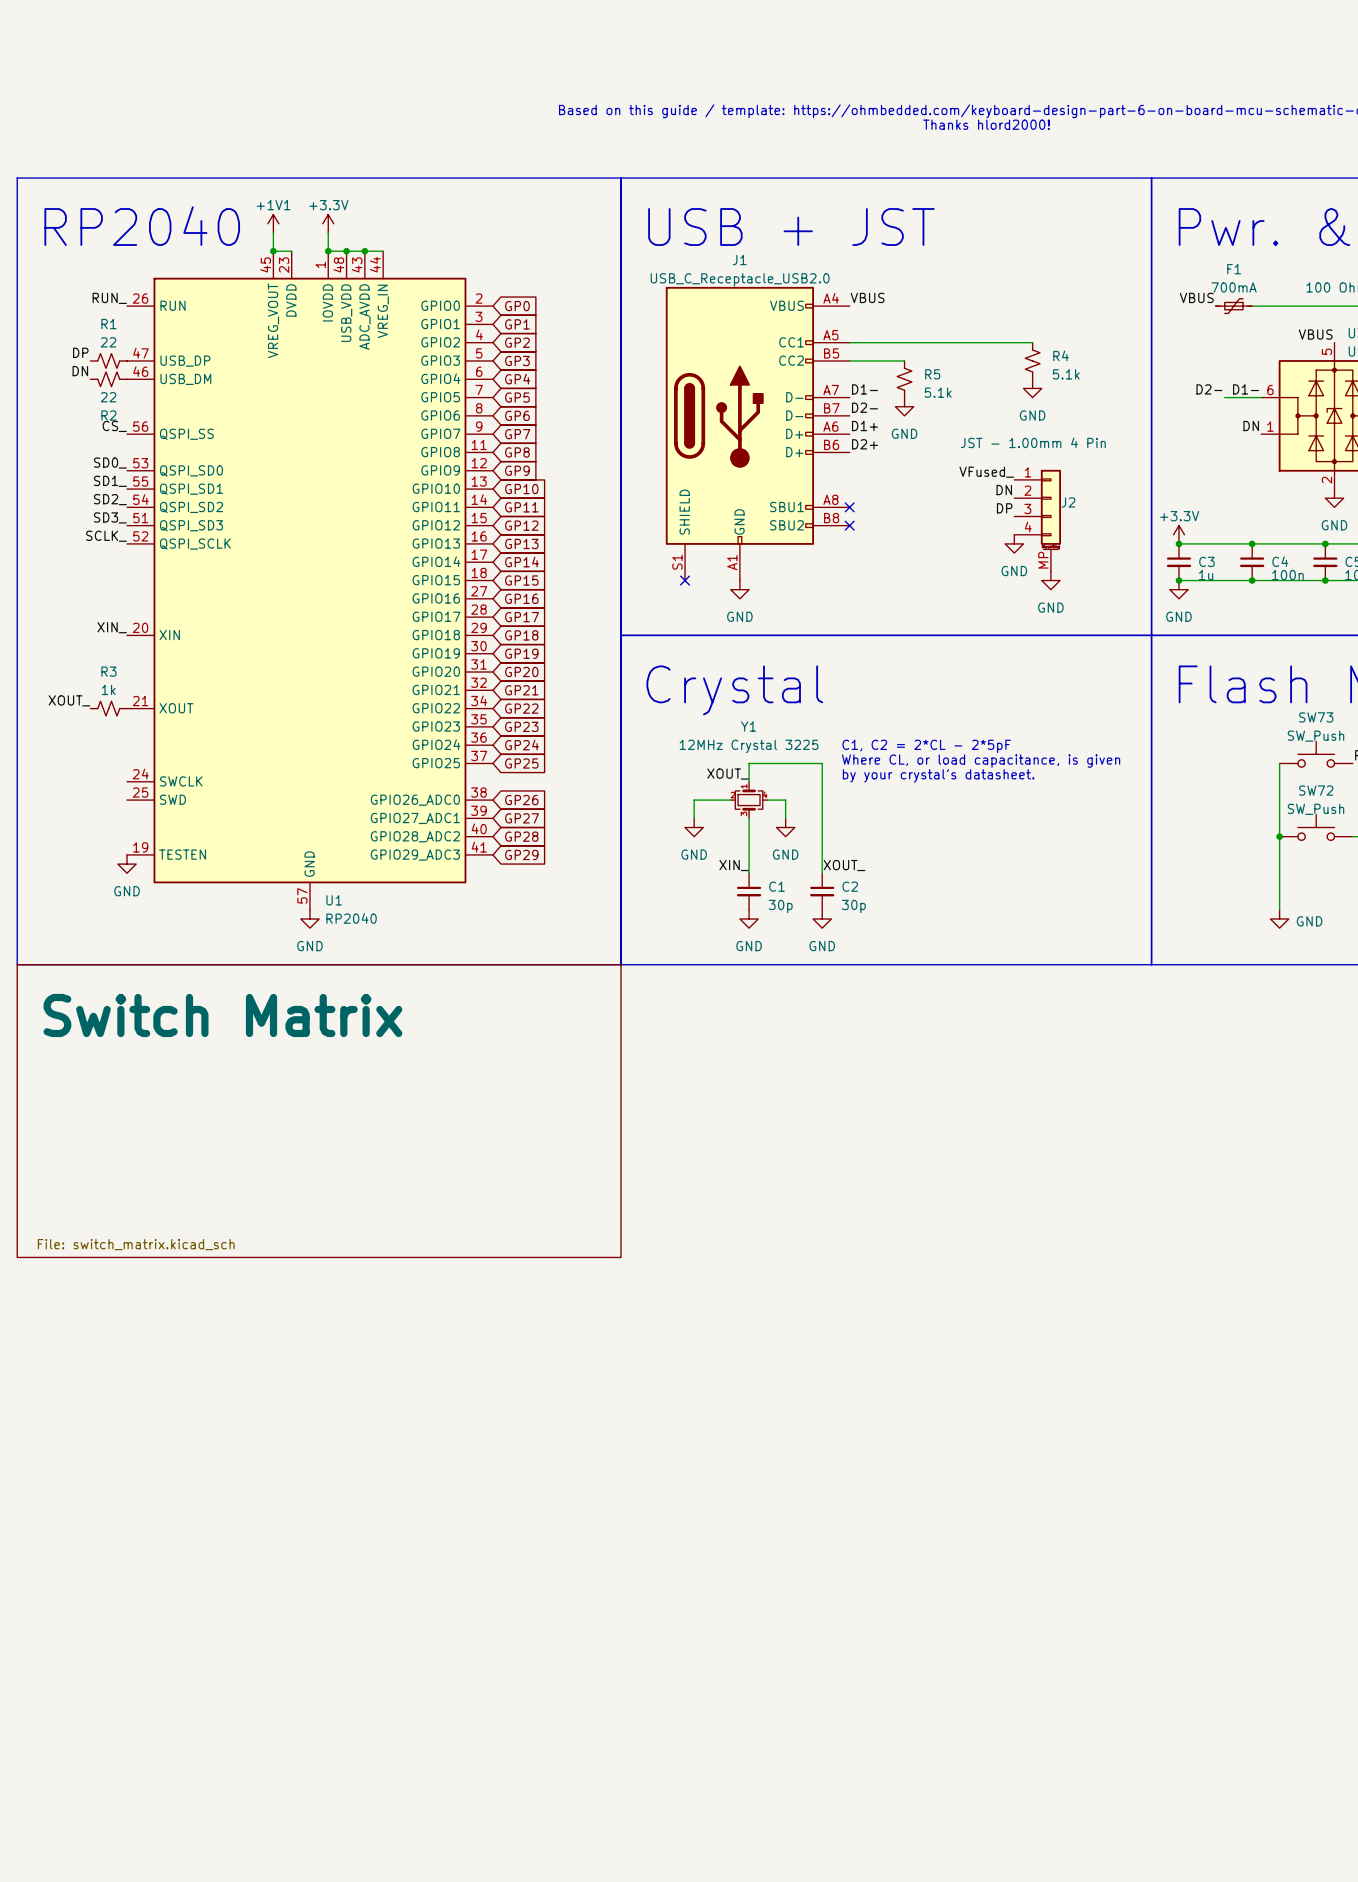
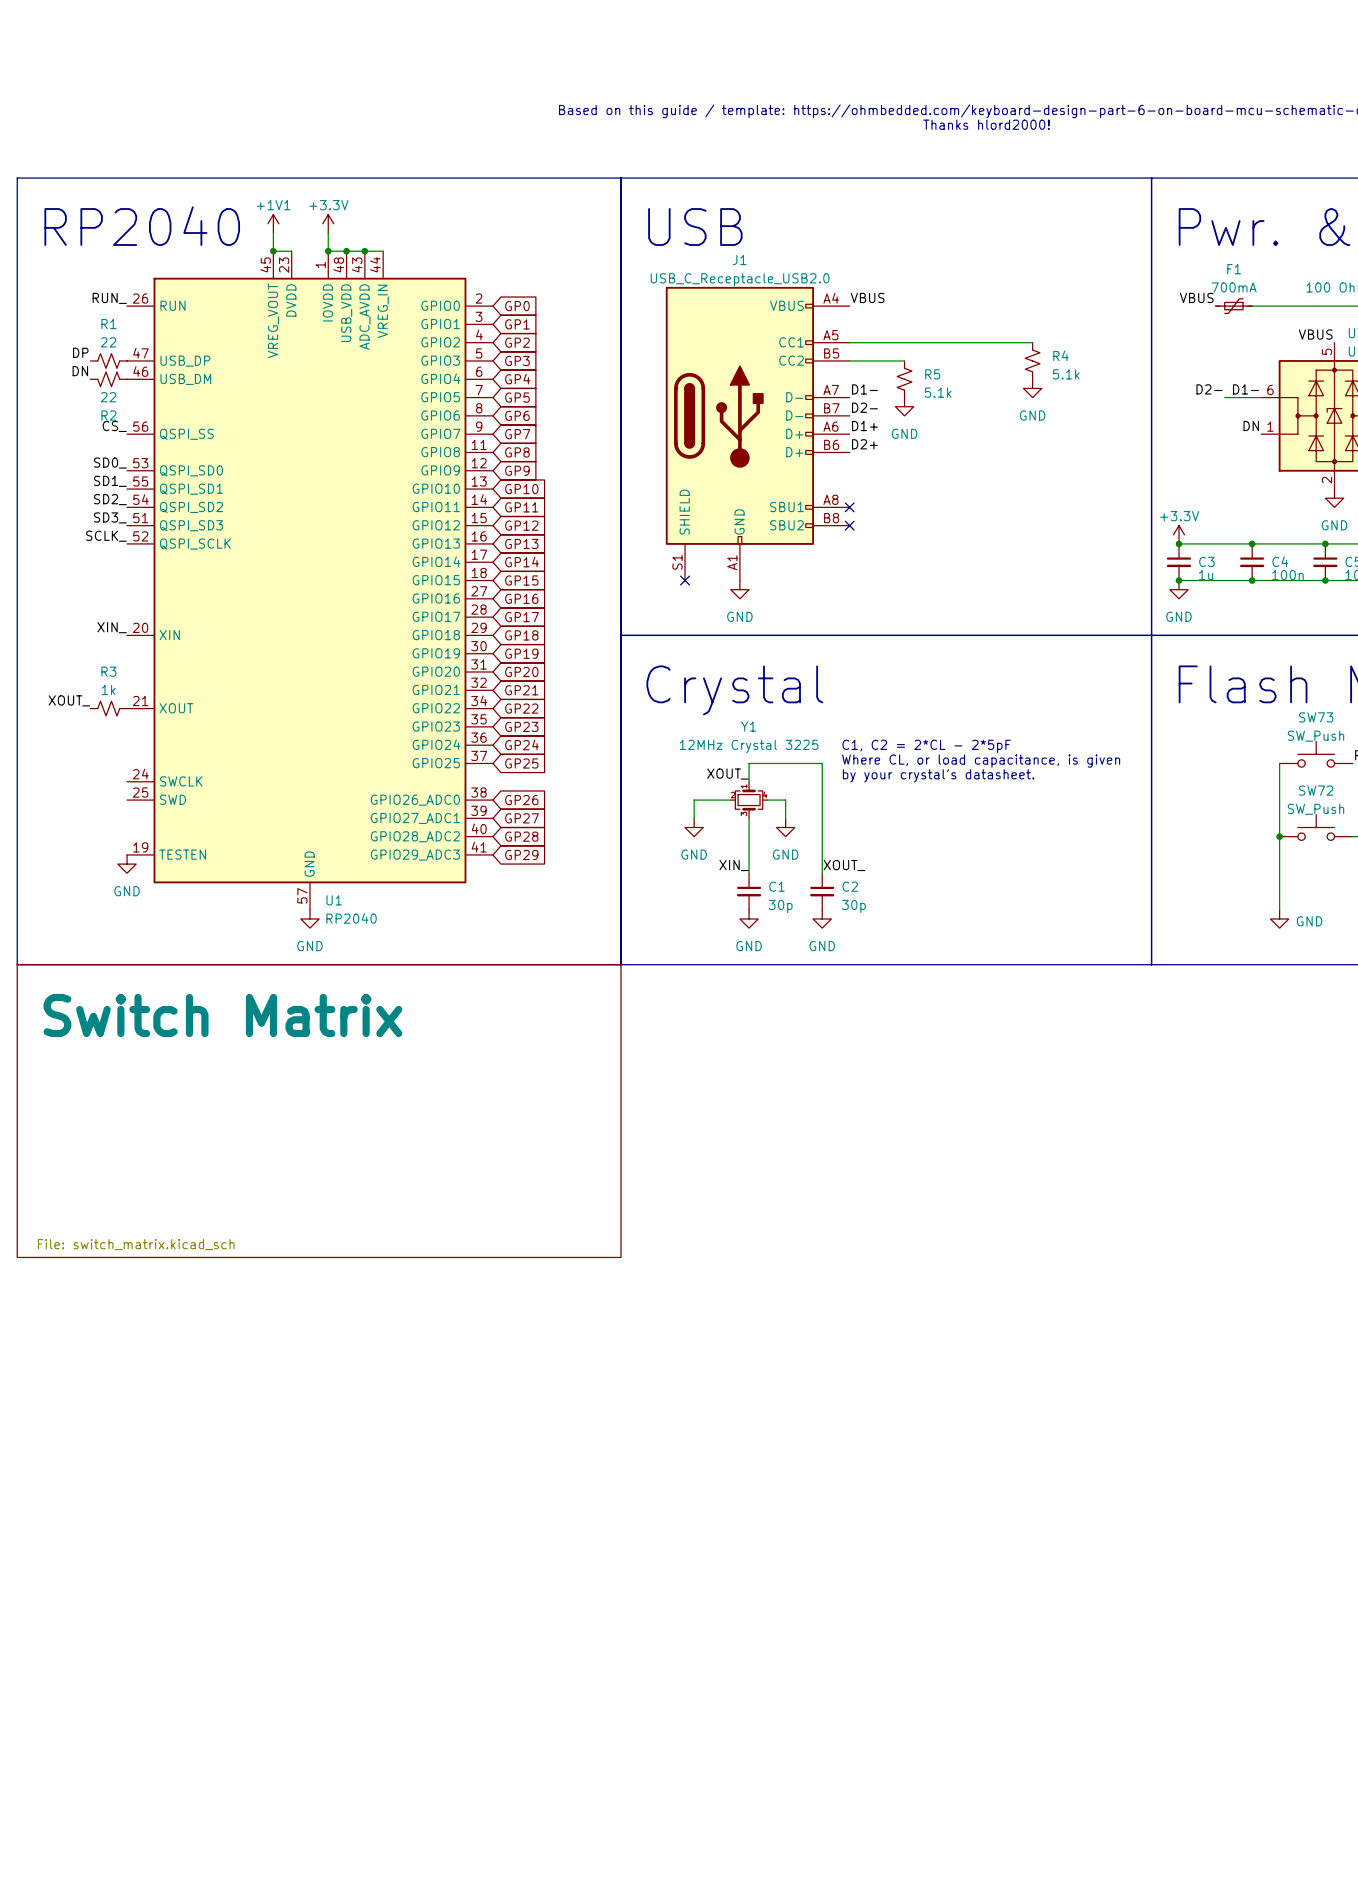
text: USB + JST (791, 227) -> USB (695, 227)
label: VFused_ (986, 472) -> none
label: DN (1004, 490) -> none
label: DP (1004, 508) -> none
J2: JST - 1.00mm 4 Pin (1037, 520) -> none
power symbol: GND (1014, 543) -> none
power symbol: GND (1050, 580) -> none

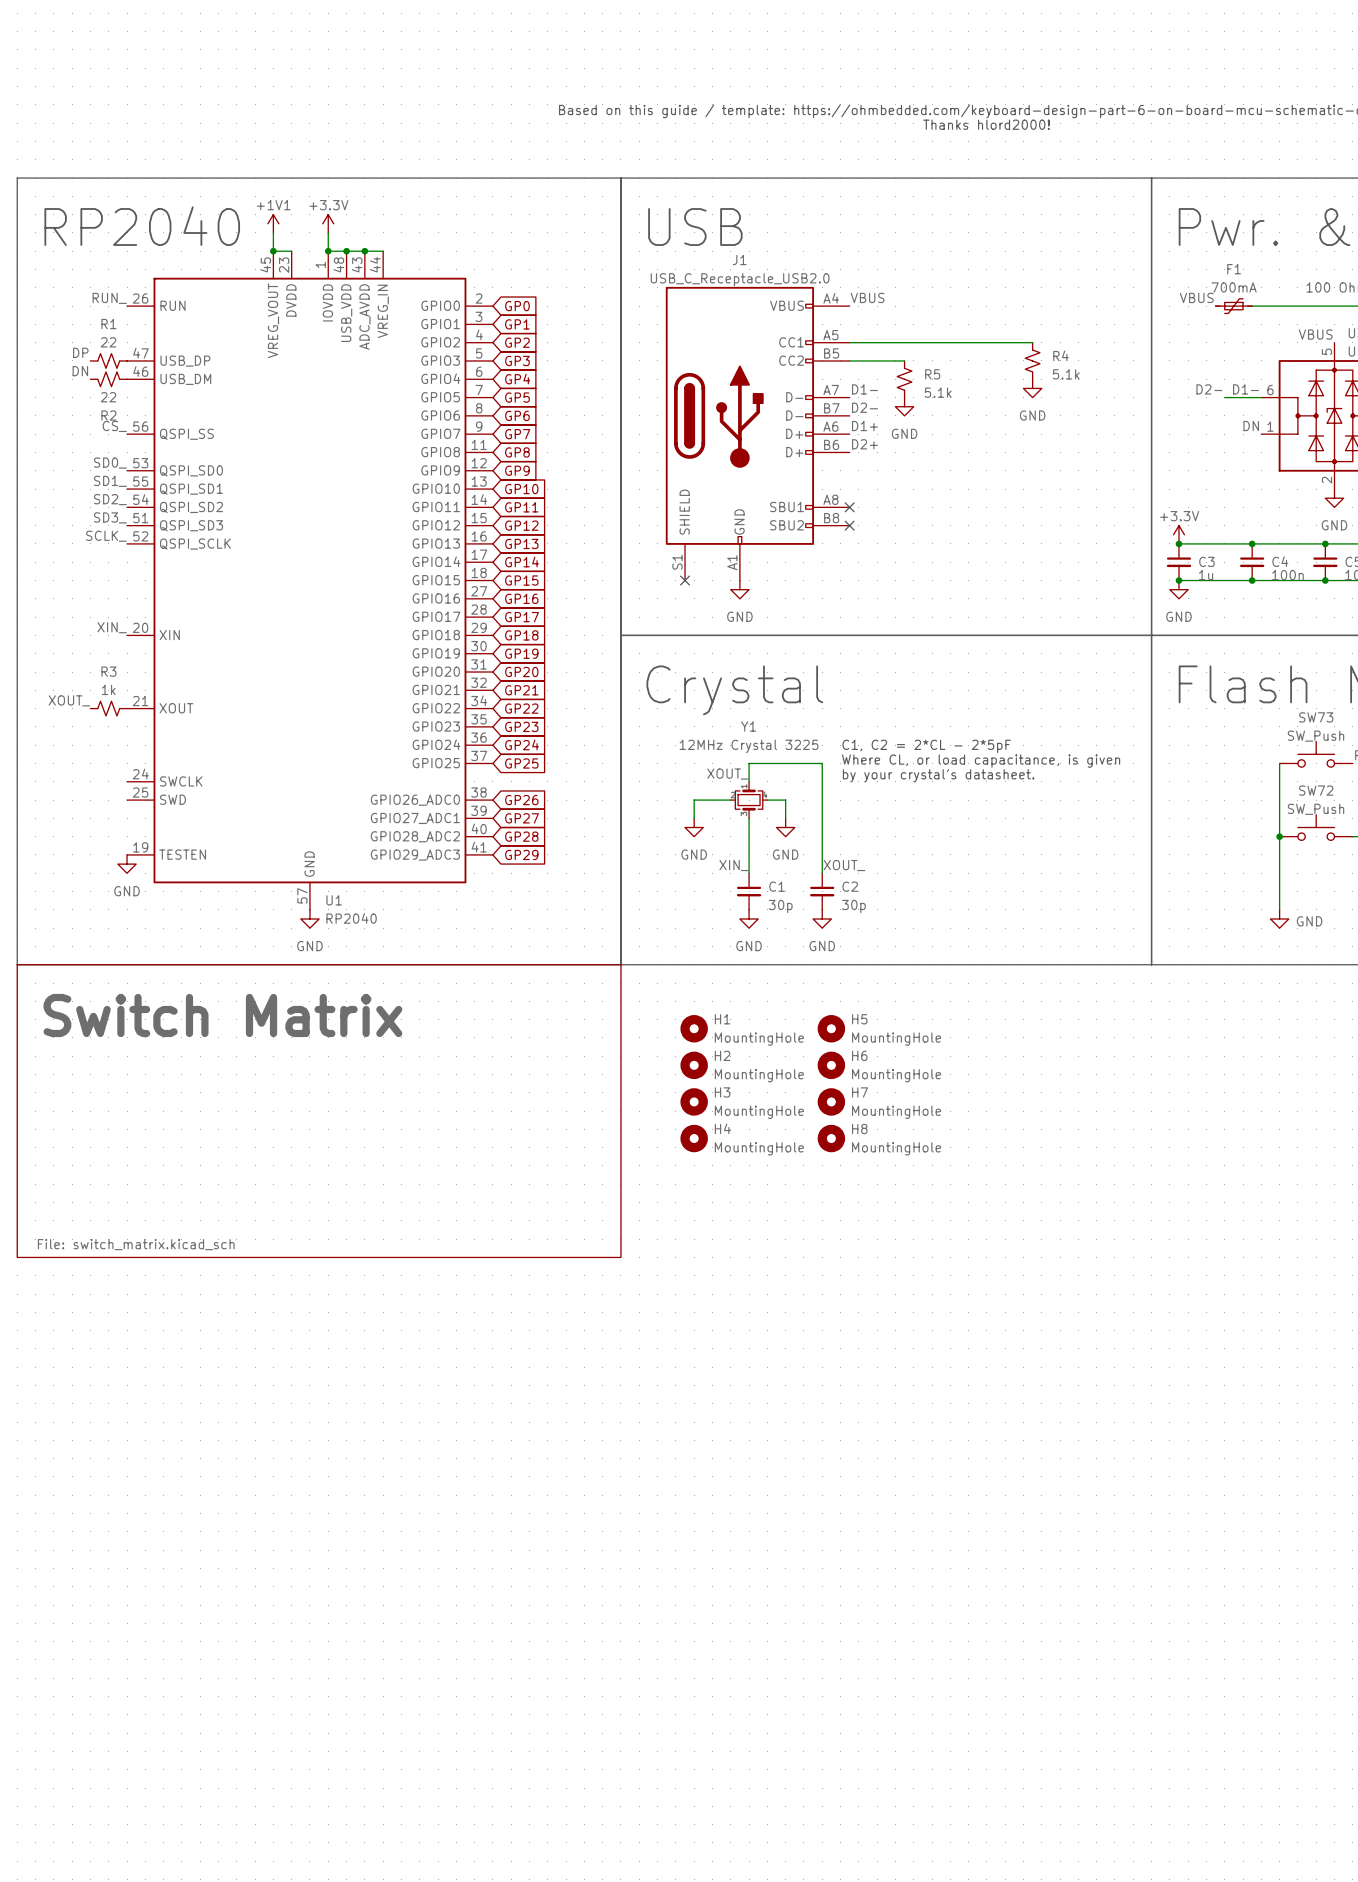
H1: none -> MountingHole (694, 1028)
H5: none -> MountingHole (831, 1028)
H2: none -> MountingHole (694, 1065)
H6: none -> MountingHole (831, 1065)
H3: none -> MountingHole (694, 1101)
H7: none -> MountingHole (831, 1101)
H4: none -> MountingHole (694, 1138)
H8: none -> MountingHole (831, 1138)

